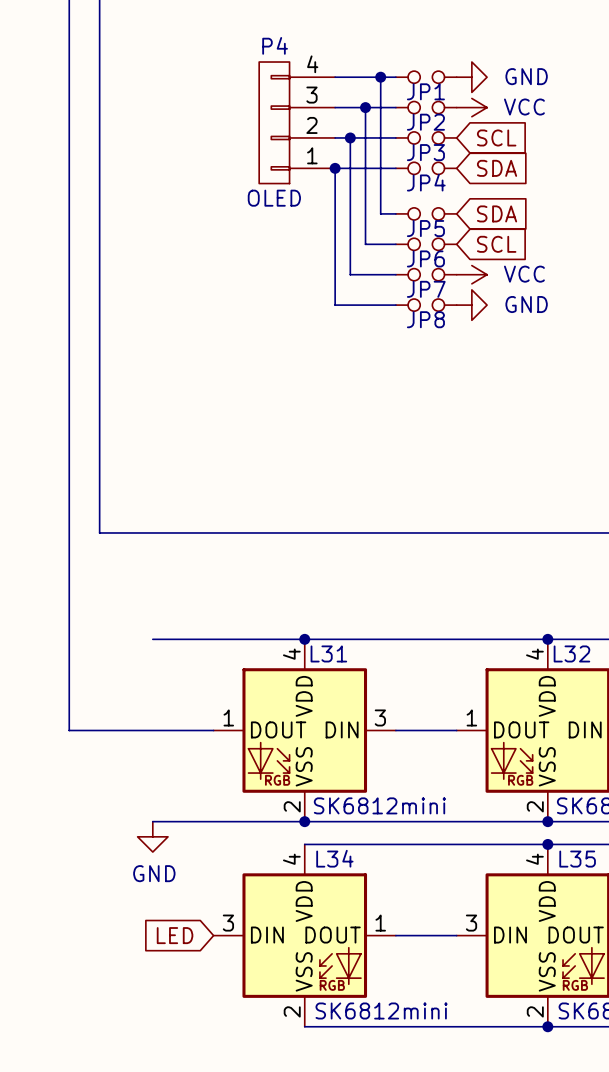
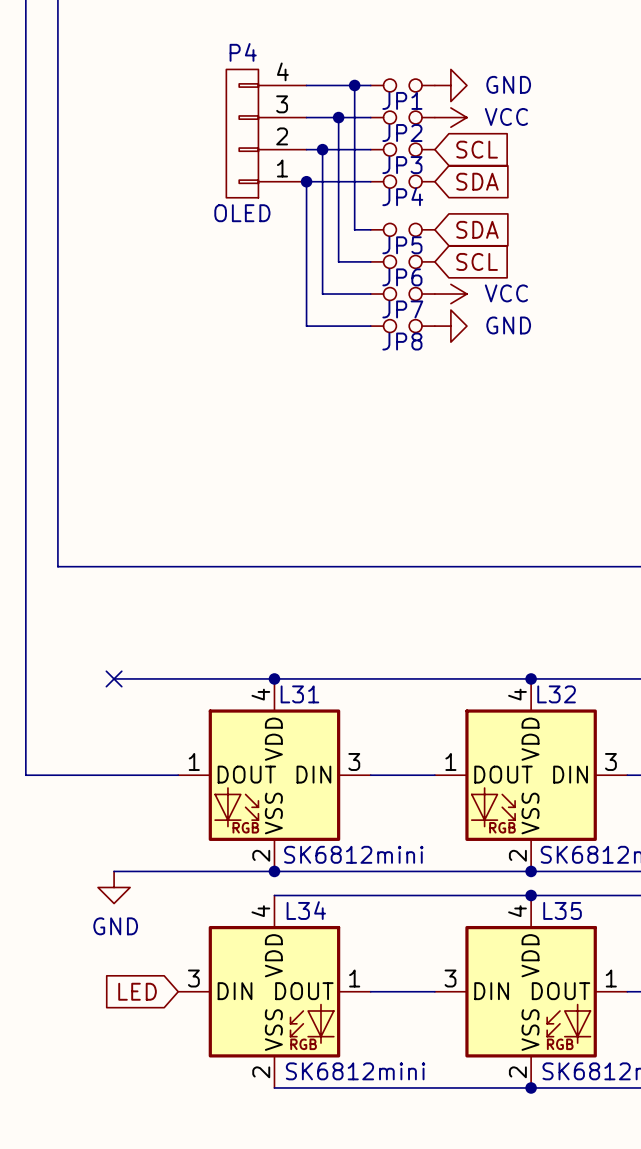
no-connect mark: none -> (114, 678)

